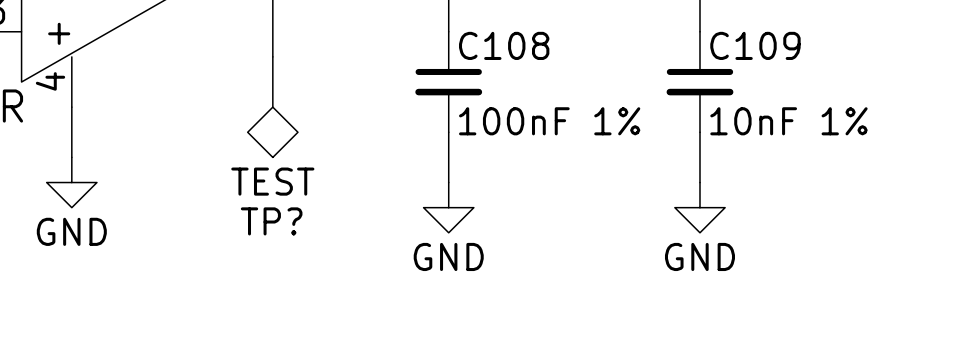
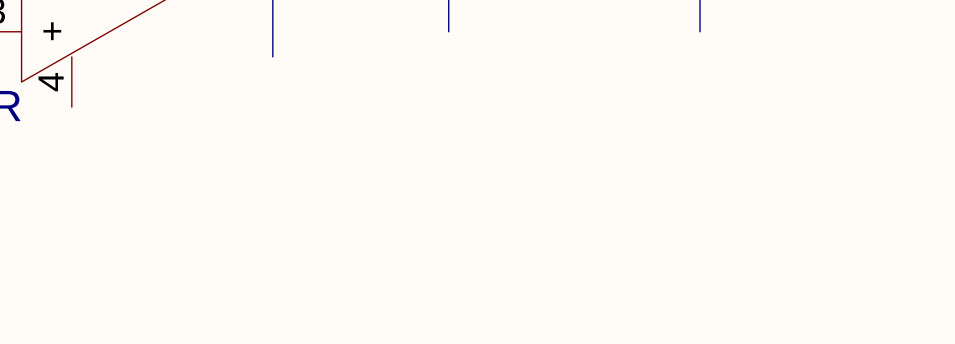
C108: 100nF 1% (448, 82) -> none
C109: 10nF 1% (699, 82) -> none
wire: (71, 107) (71, 157) -> none
TP?: TEST (272, 107) -> none
wire: (448, 132) (448, 182) -> none
wire: (699, 132) (699, 182) -> none
power symbol: GND (71, 182) -> none
power symbol: GND (448, 207) -> none
power symbol: GND (699, 207) -> none

